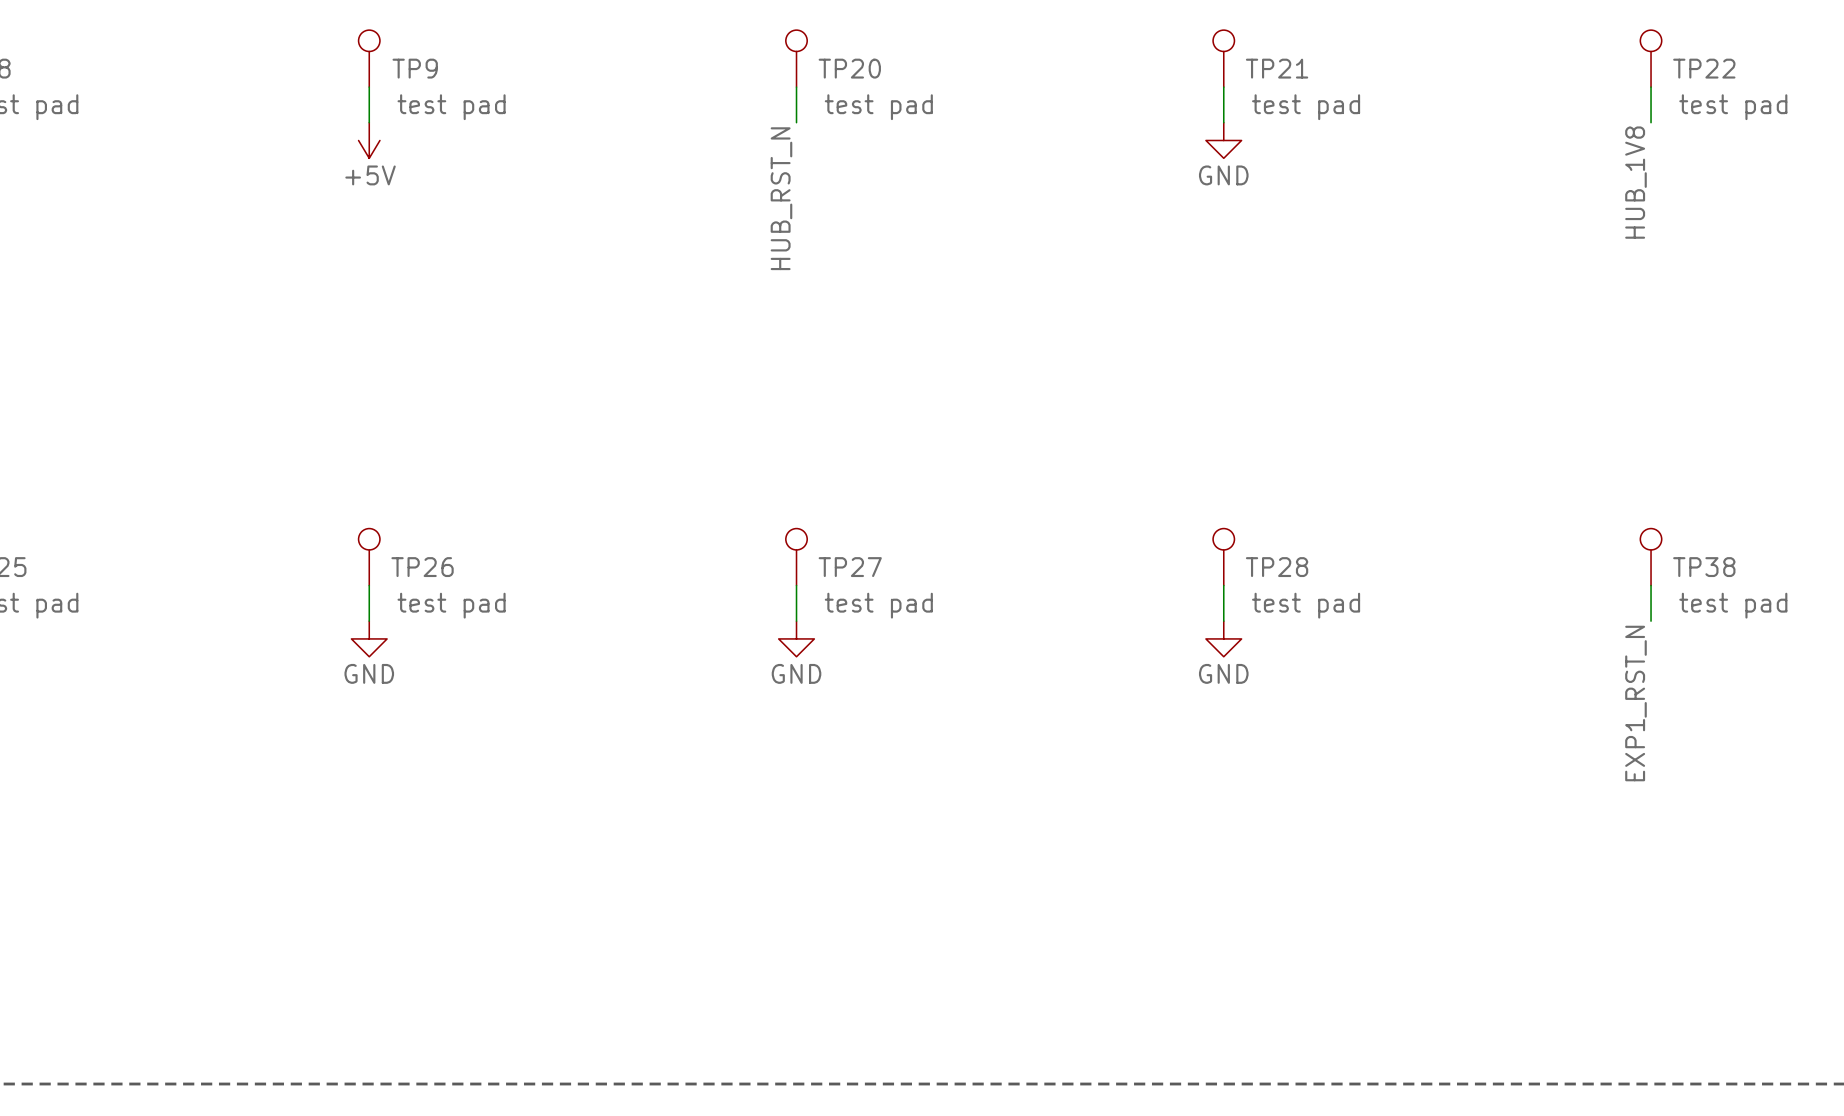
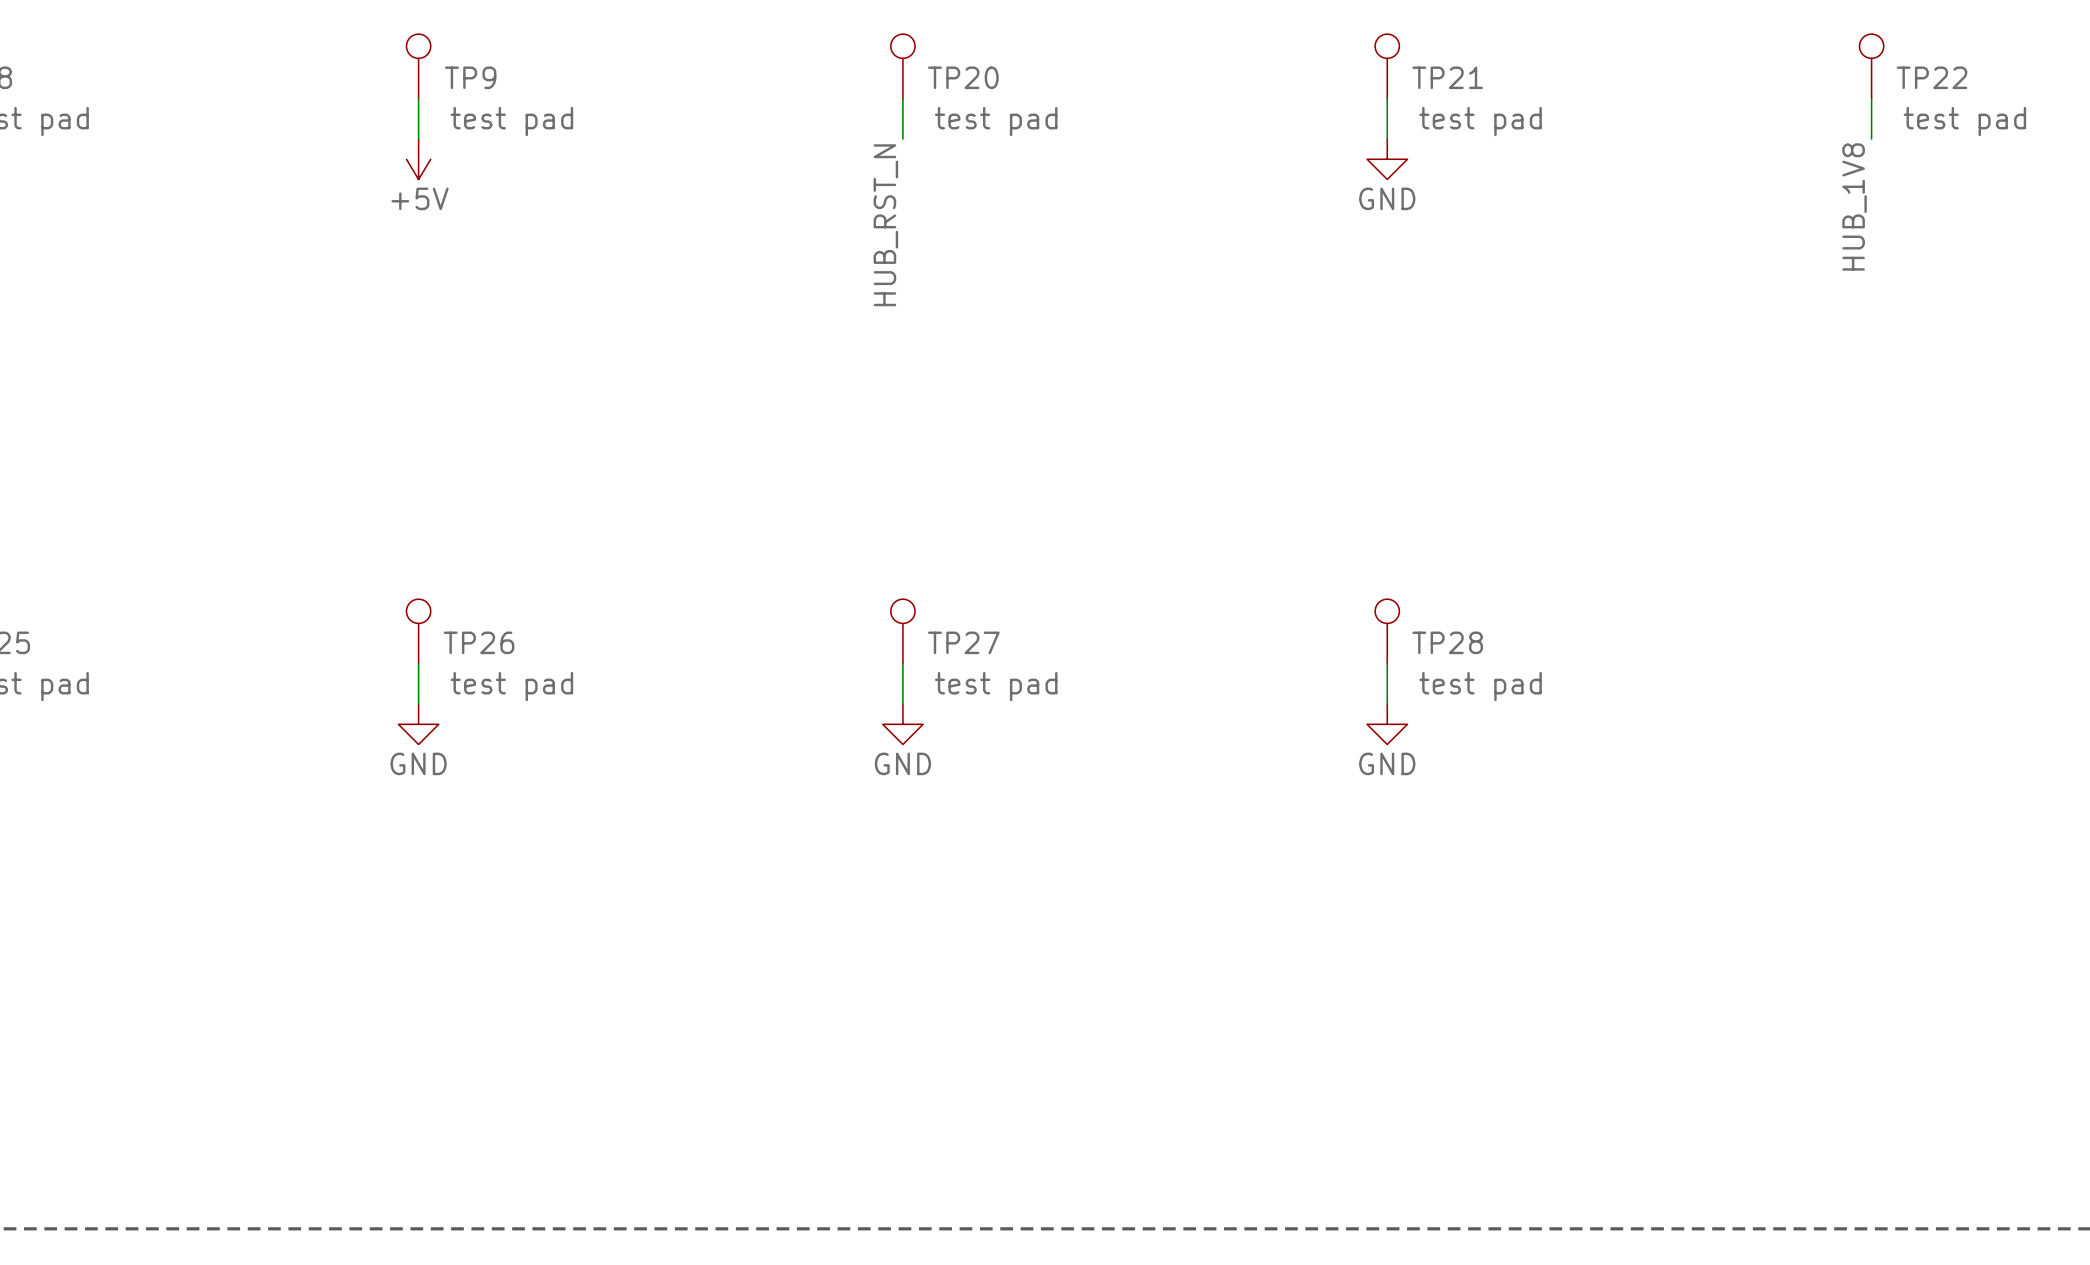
TP38: test pad (1651, 557) -> none
wire: (1651, 585) (1651, 621) -> none
label: EXP1_RST_N (1635, 703) -> none

